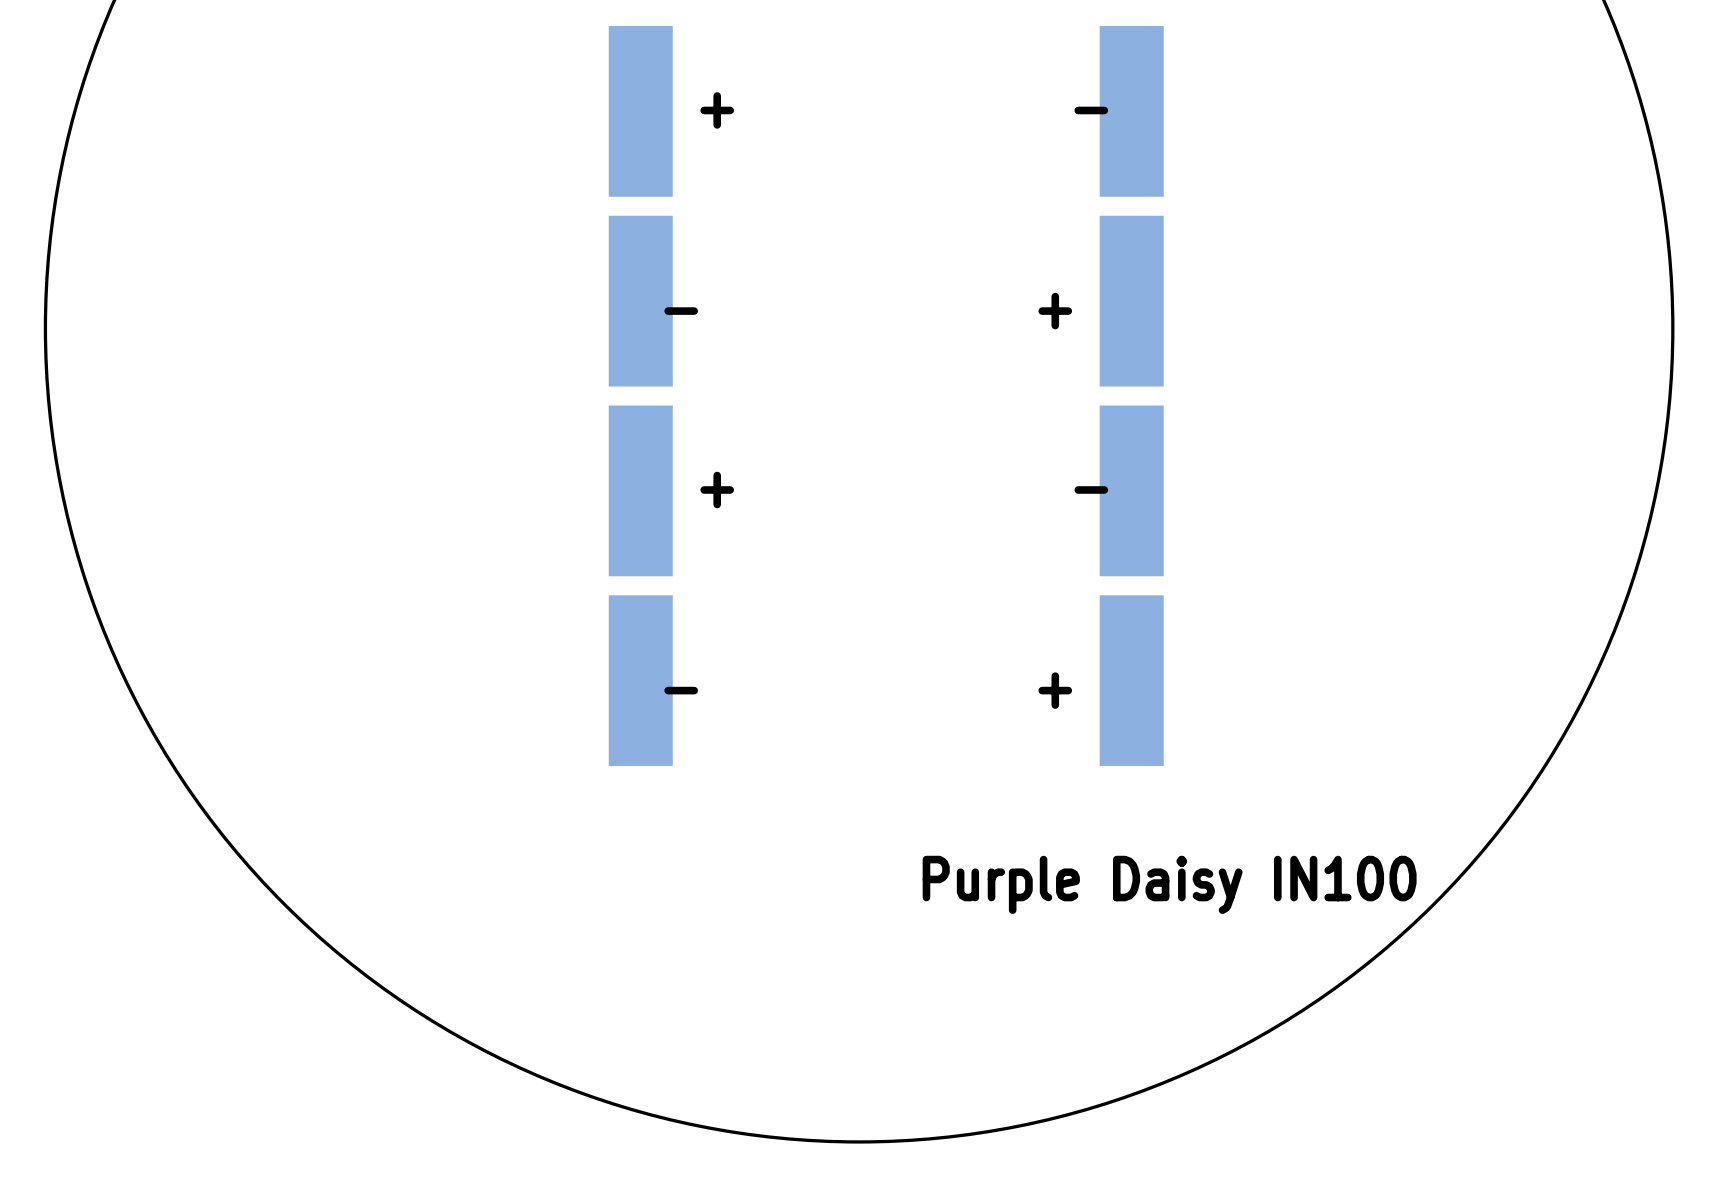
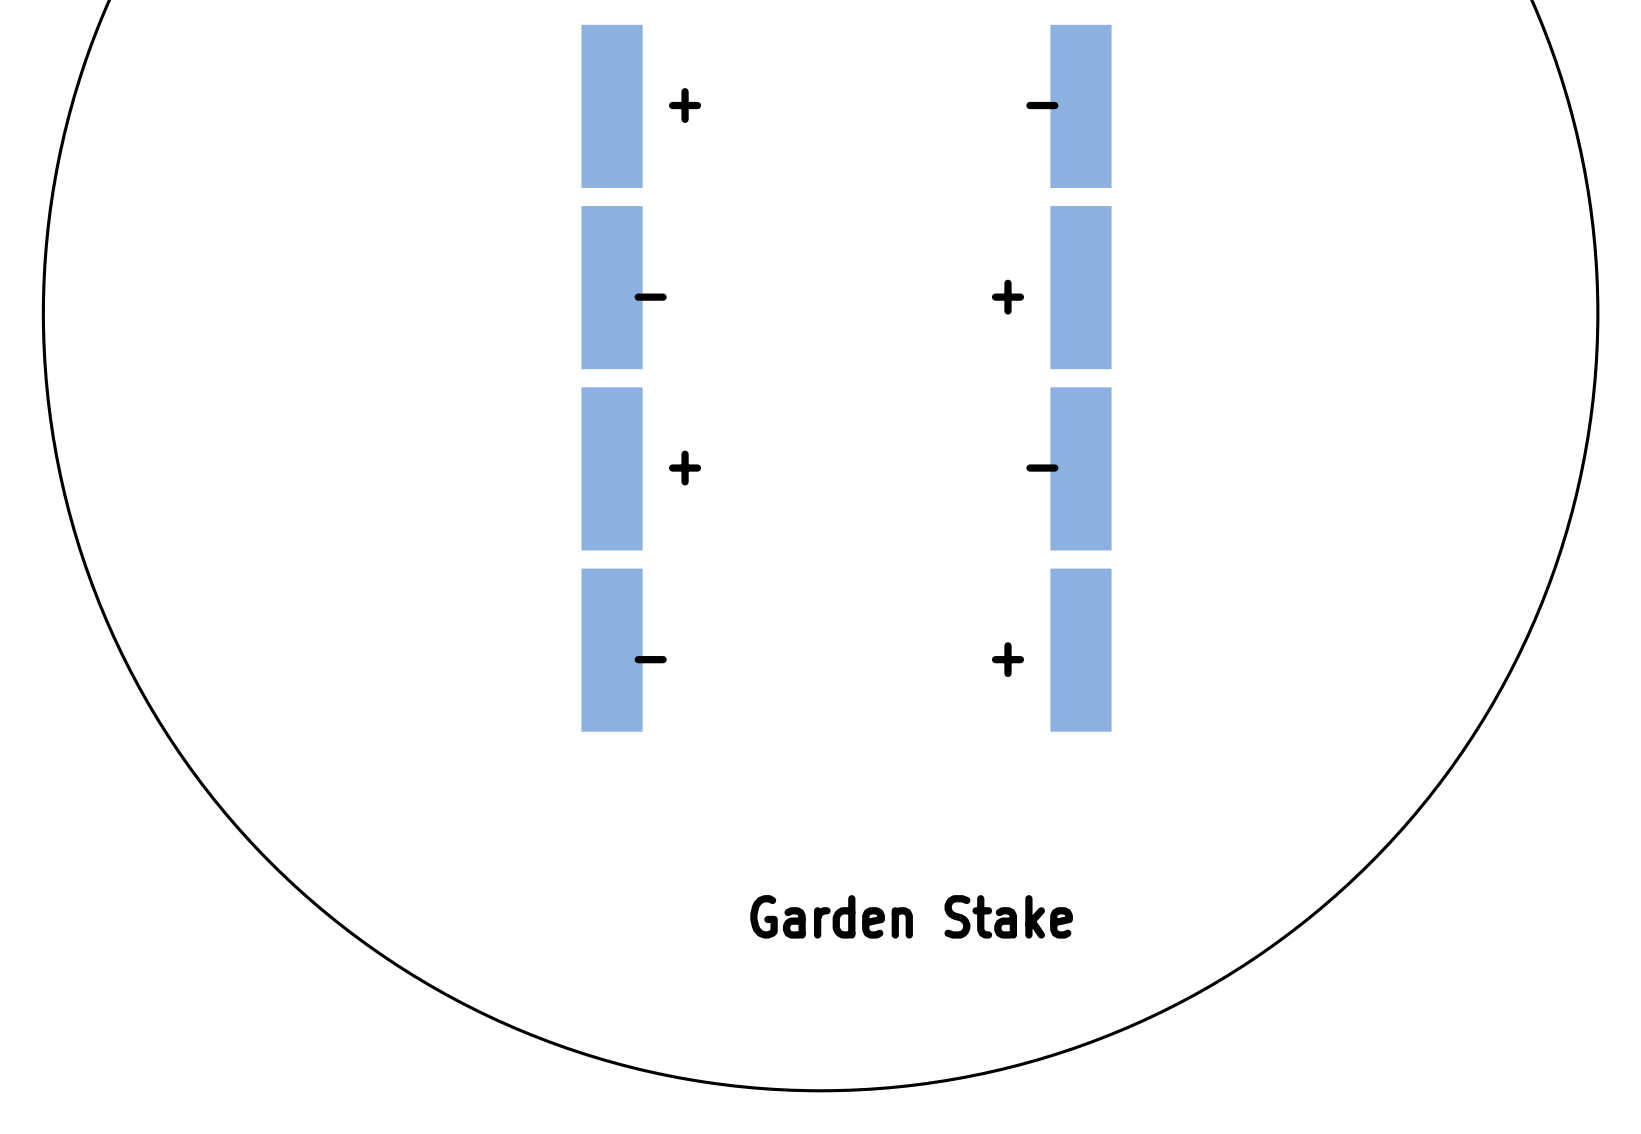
text: Purple Daisy IN100 (1169, 884) -> none
text: none -> Garden Stake (911, 916)

